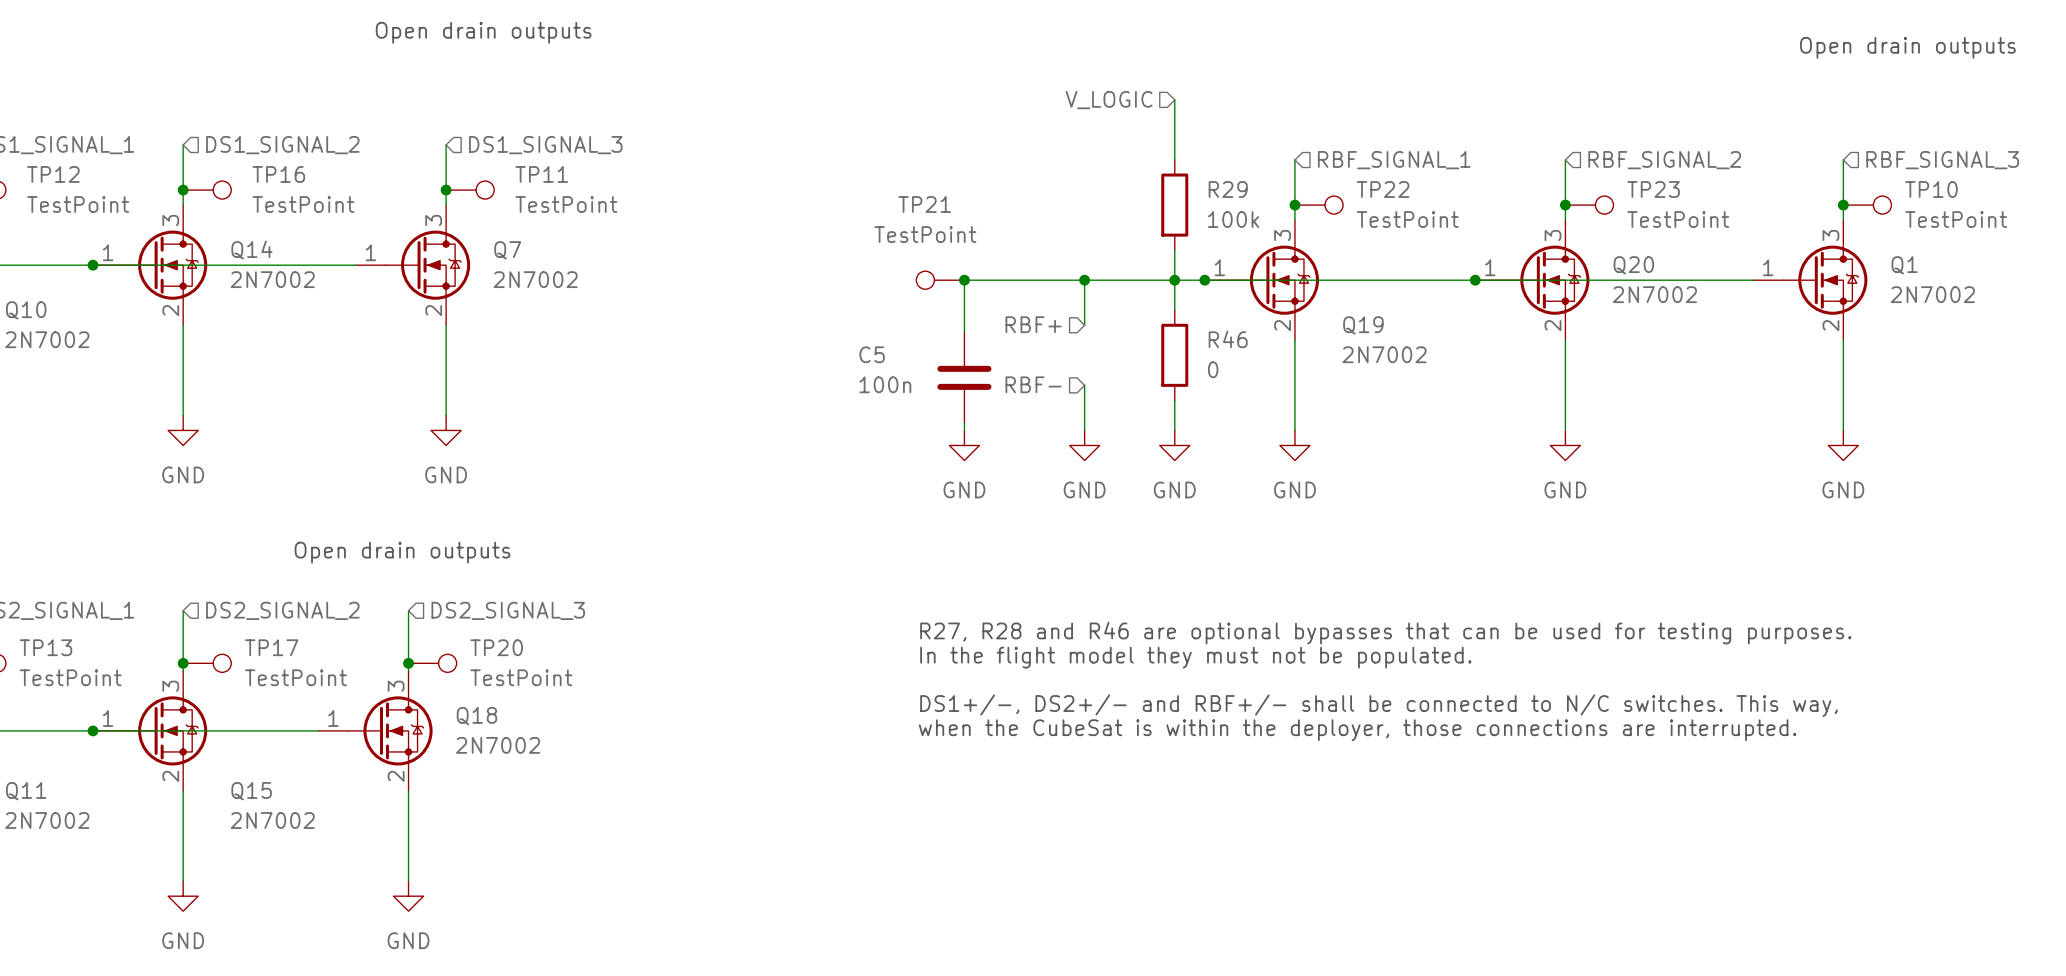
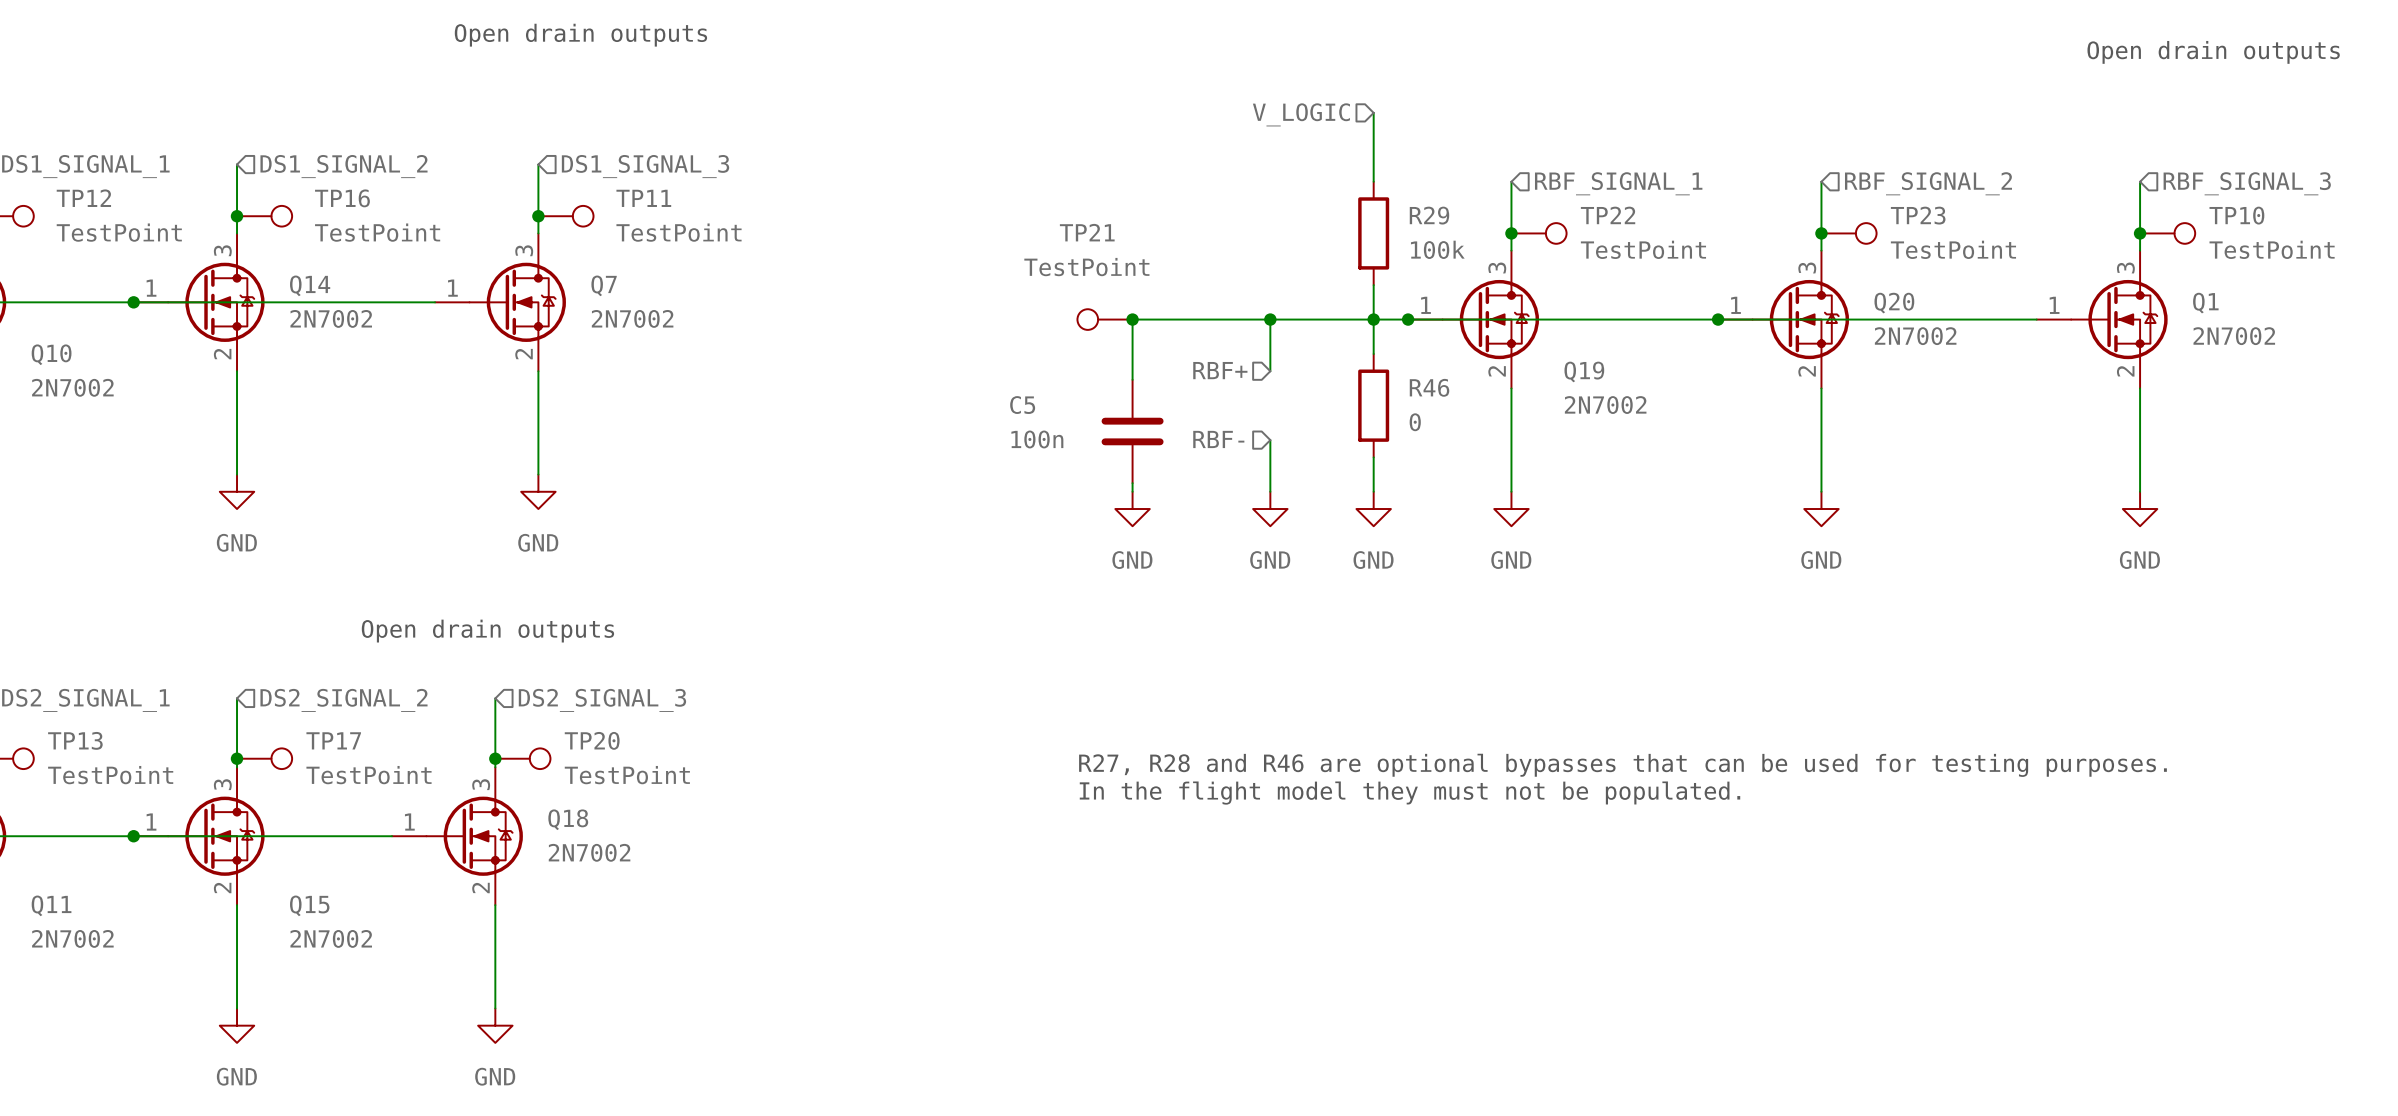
text position: R27, R28 and R46 are optional bypasses that can be used for testing purposes. (1385, 633) -> R27, R28 and R46 are optional bypasses that can be used for testing purposes. (1622, 765)
text position: In the flight model they must not be populated. (1195, 657) -> In the flight model they must not be populated. (1409, 793)
text: DS1+/-, DS2+/- and RBF+/- shall be connected to N/C switches. This way, (1379, 705) -> none
text: when the CubeSat is within the deployer, those connections are interrupted. (1357, 730) -> none

